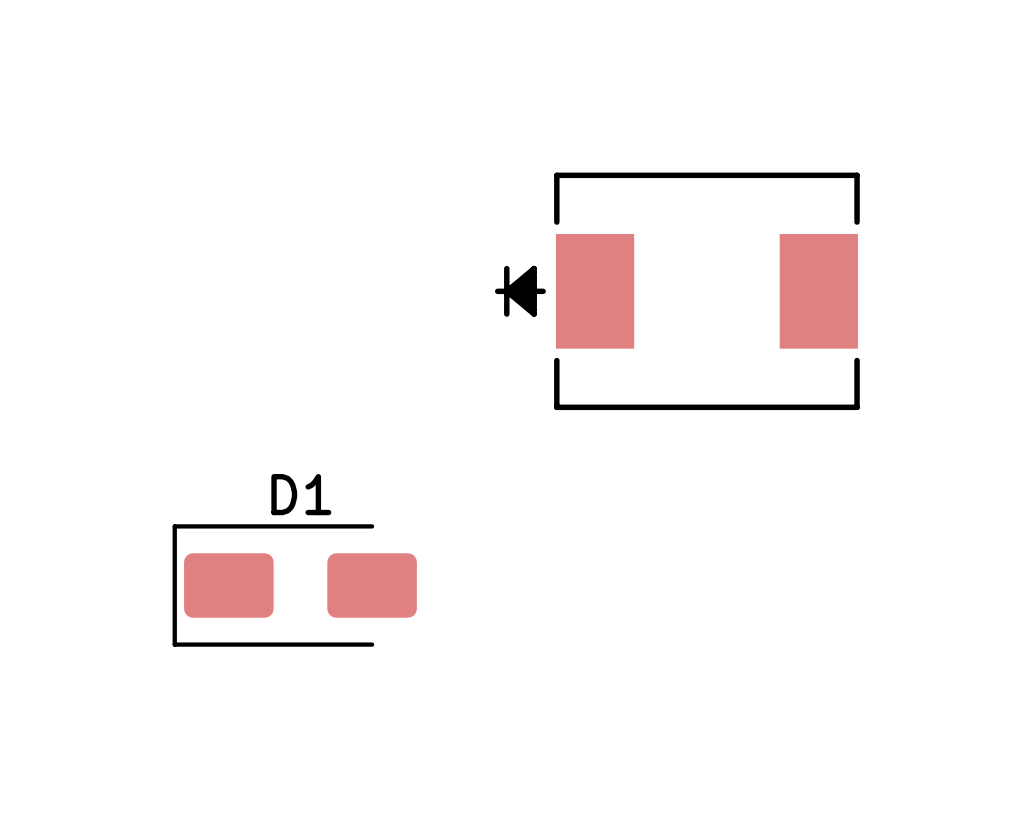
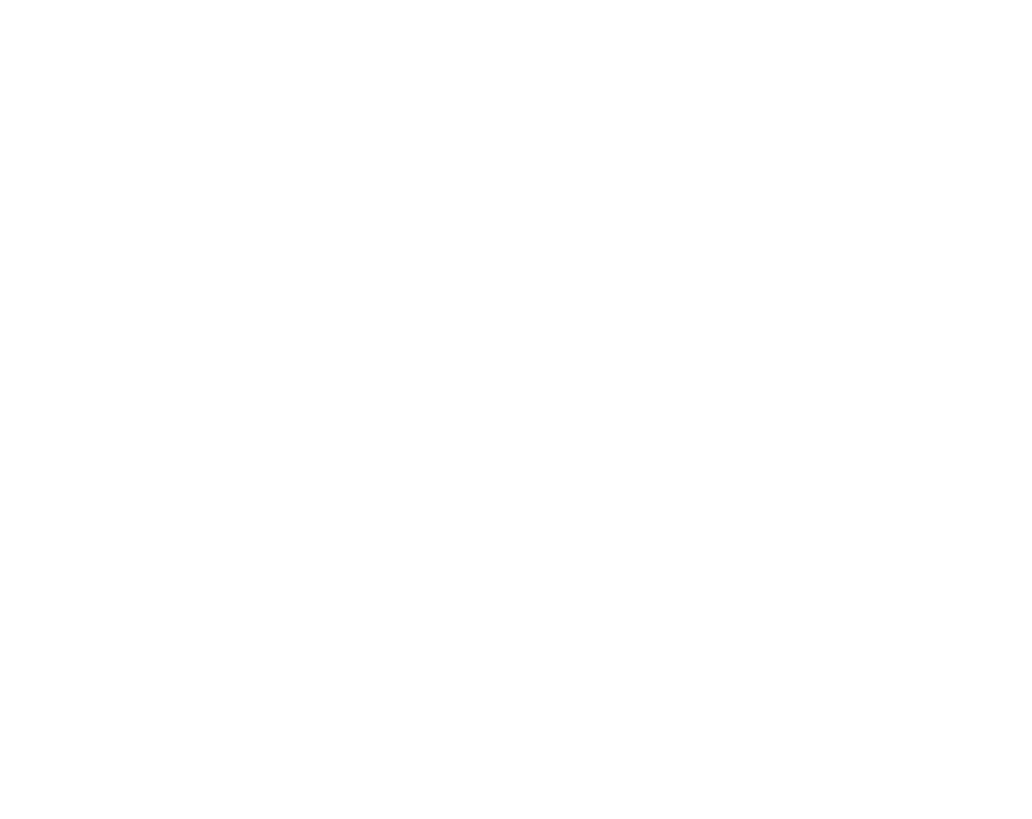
part: (677, 291) -> none
D1: (294, 585) -> none

